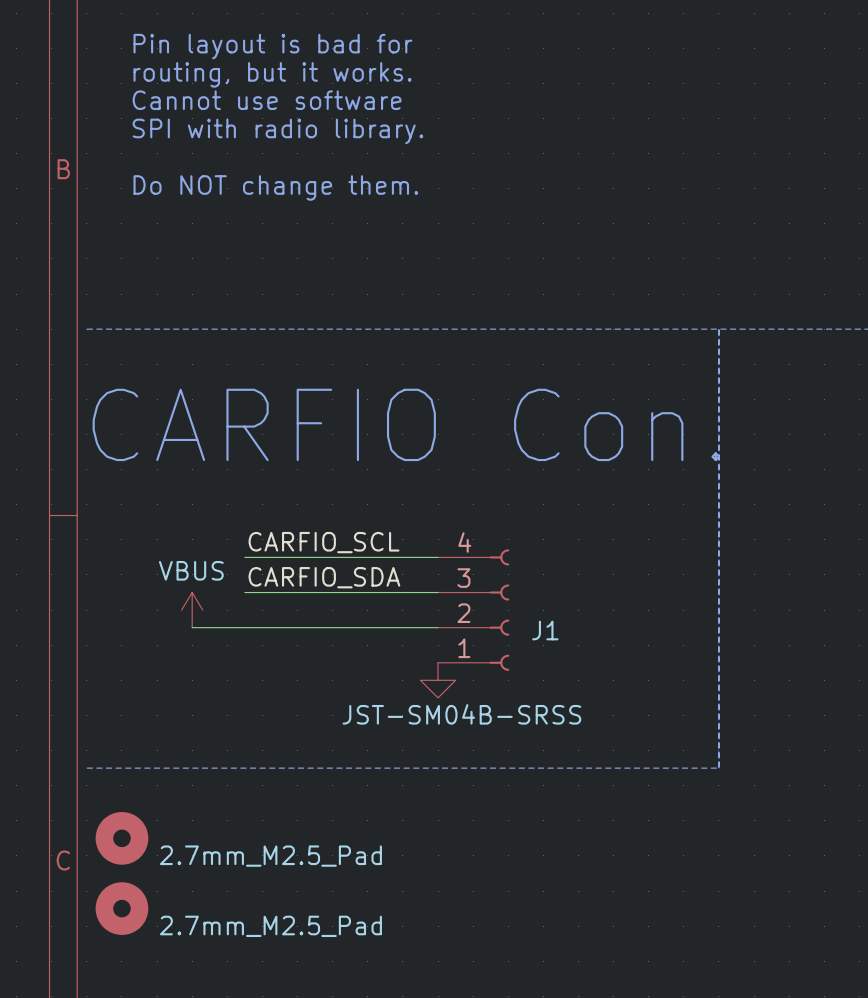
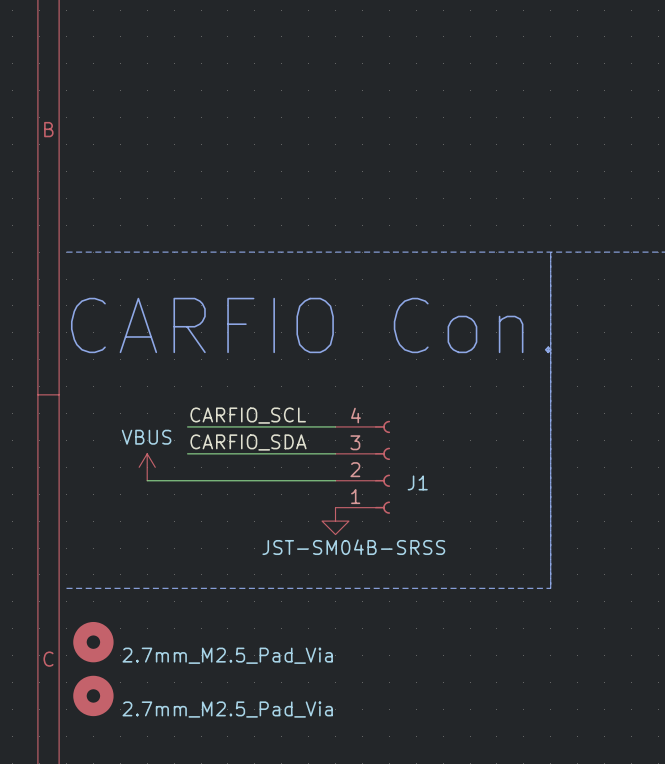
text: Pin layout is bad for (272, 46) -> none
text: routing, but it works. (272, 74) -> none
text: Cannot use software (267, 100) -> none
text: SPI with radio library. (277, 131) -> none
text: Do NOT change them. (275, 187) -> none
part value: 2.7mm_M2.5_Pad (270, 856) -> 2.7mm_M2.5_Pad_Via (227, 655)
part value: 2.7mm_M2.5_Pad (270, 926) -> 2.7mm_M2.5_Pad_Via (227, 709)

